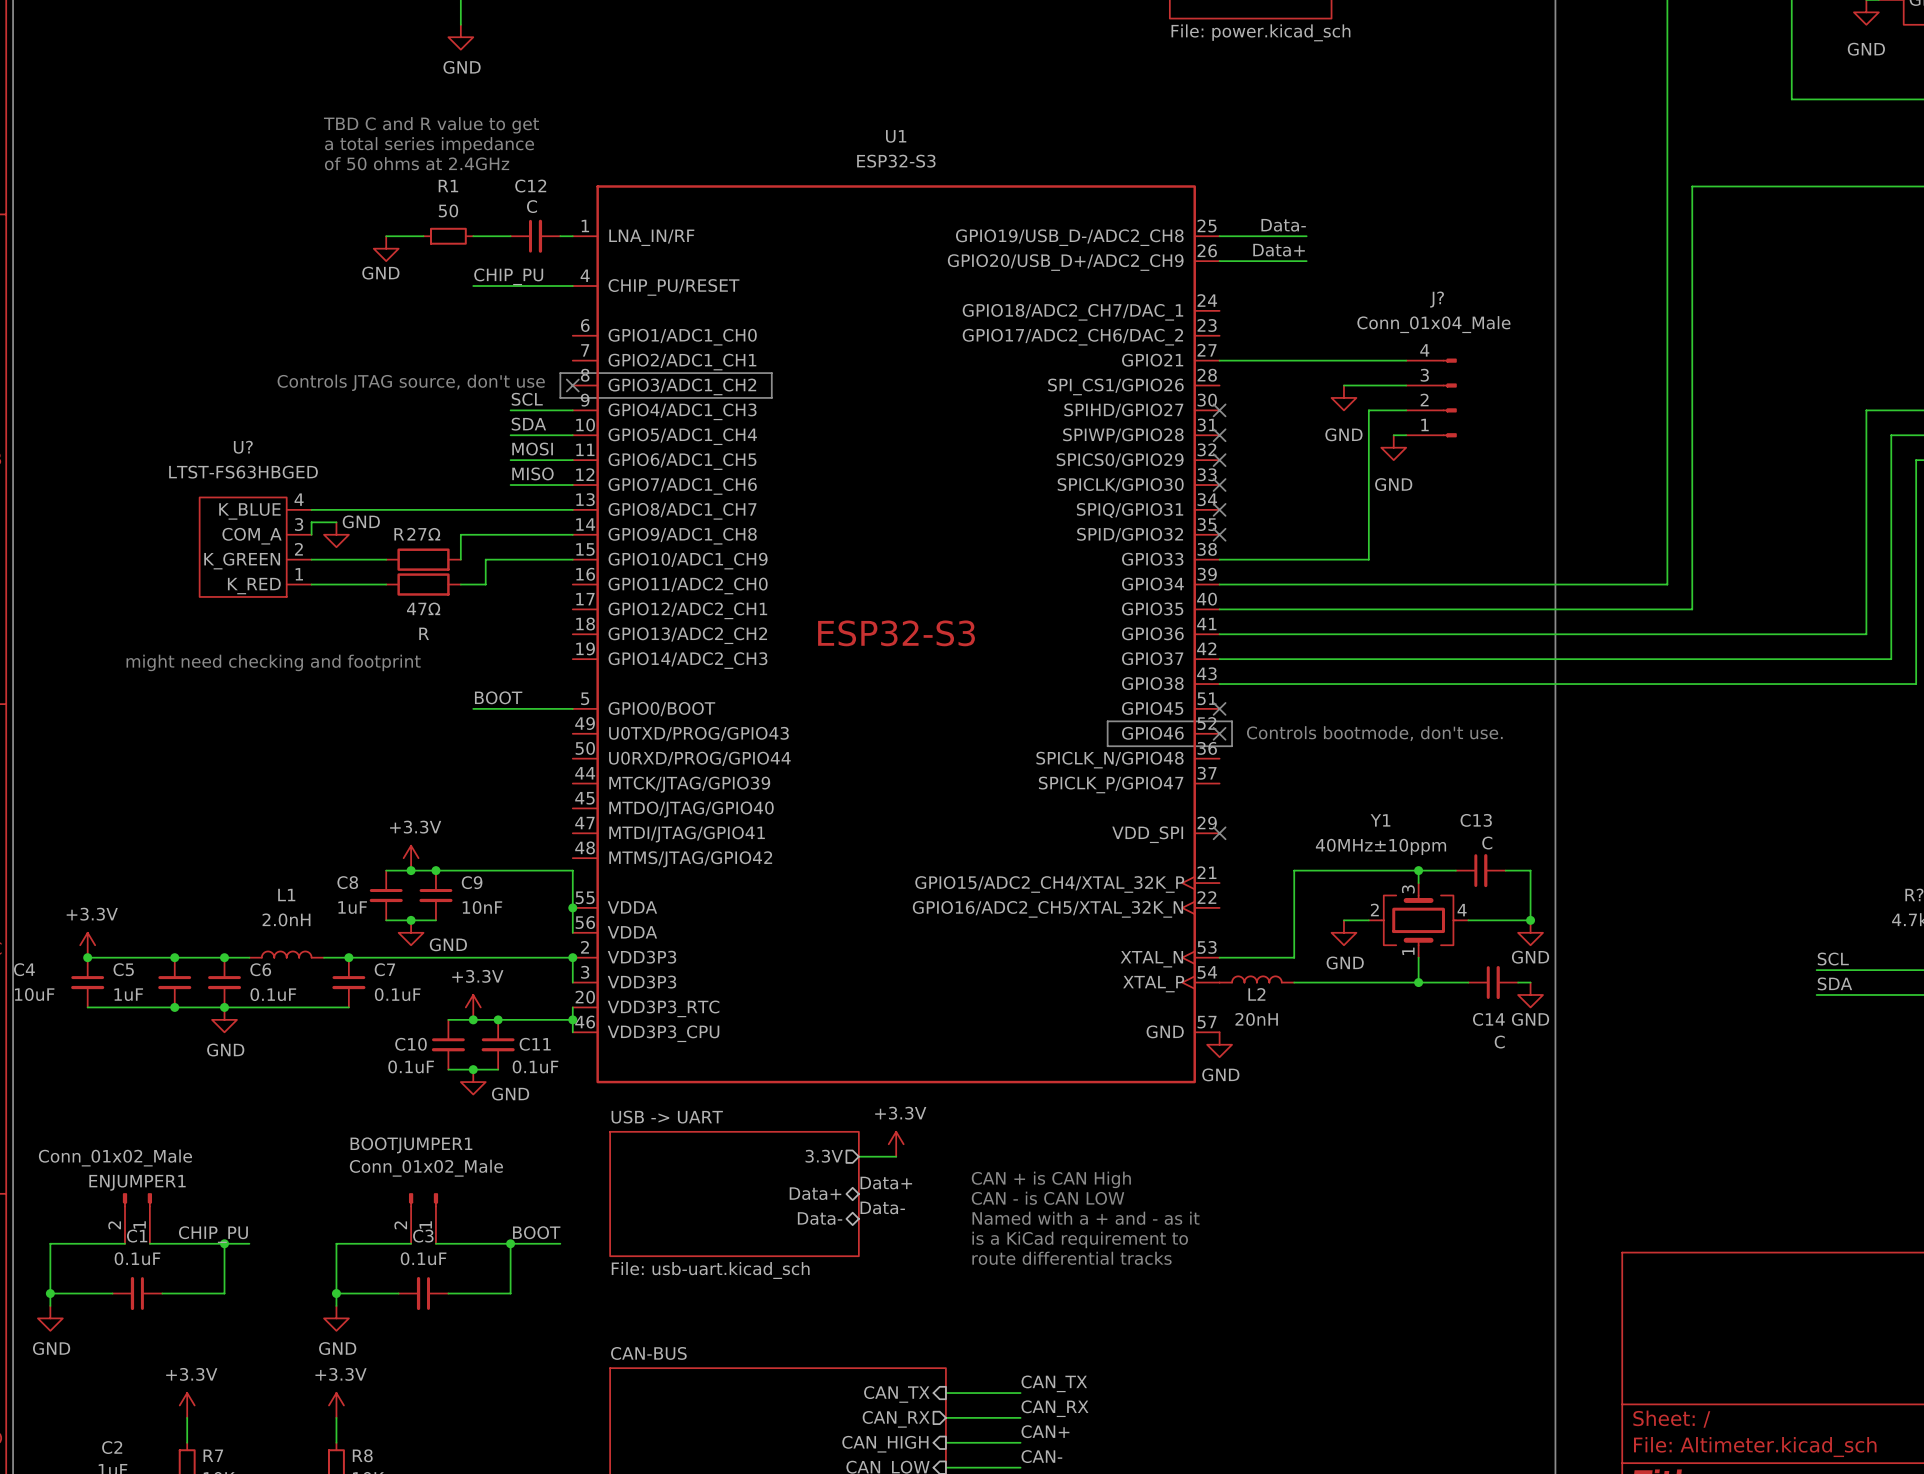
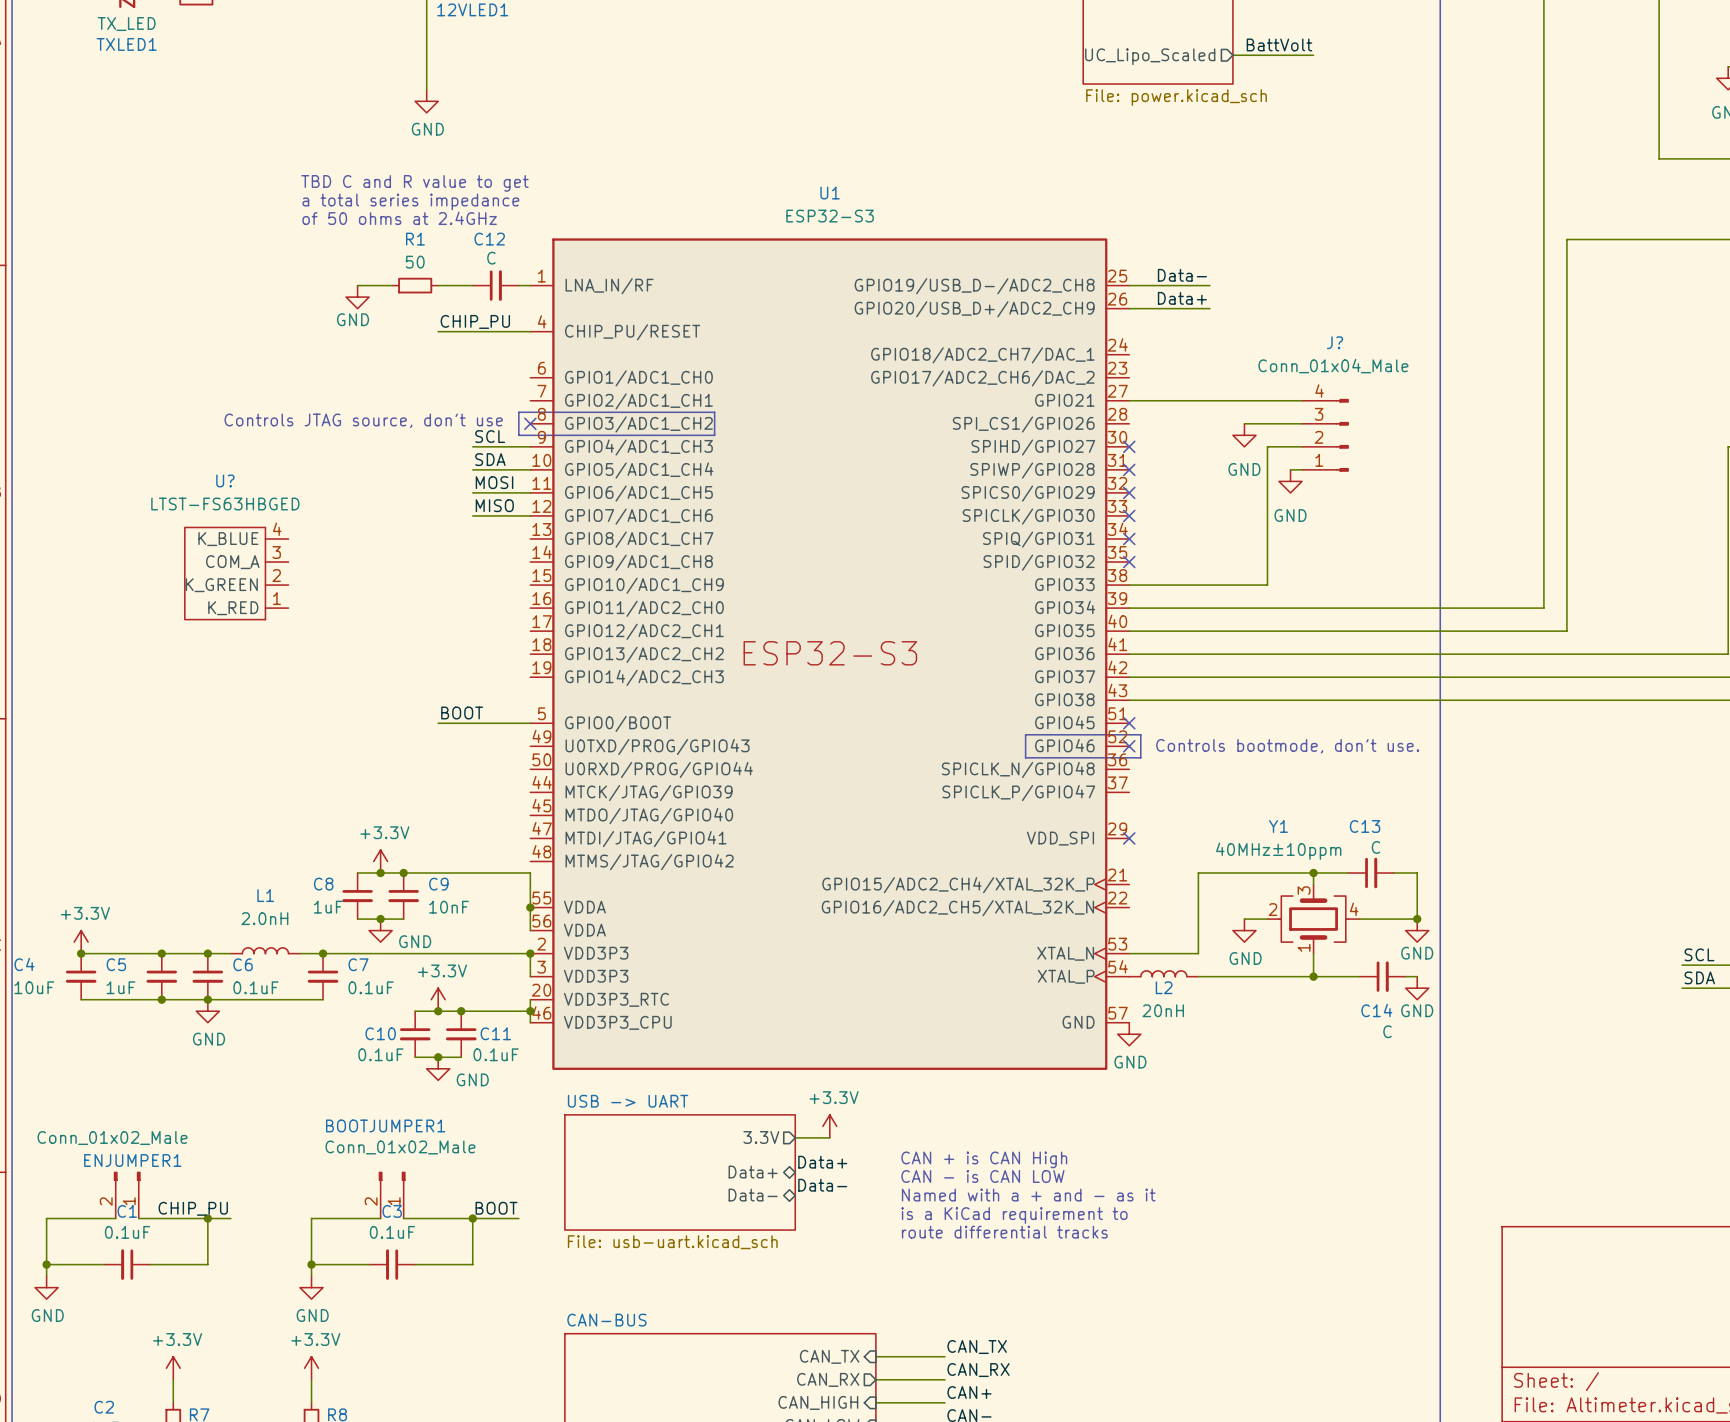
wire: (311, 509) (572, 509) -> none
wire: (336, 522) (311, 522) (311, 534) -> none
power symbol: GND (336, 534) -> none
wire: (572, 534) (460, 534) (460, 559) -> none
wire: (311, 559) (386, 559) -> none
27Ω: R (423, 559) -> none
wire: (572, 559) (485, 559) (485, 584) (460, 584) -> none
wire: (311, 584) (386, 584) -> none
47Ω: R (423, 584) -> none
text: might need checking and footprint (273, 662) -> none

